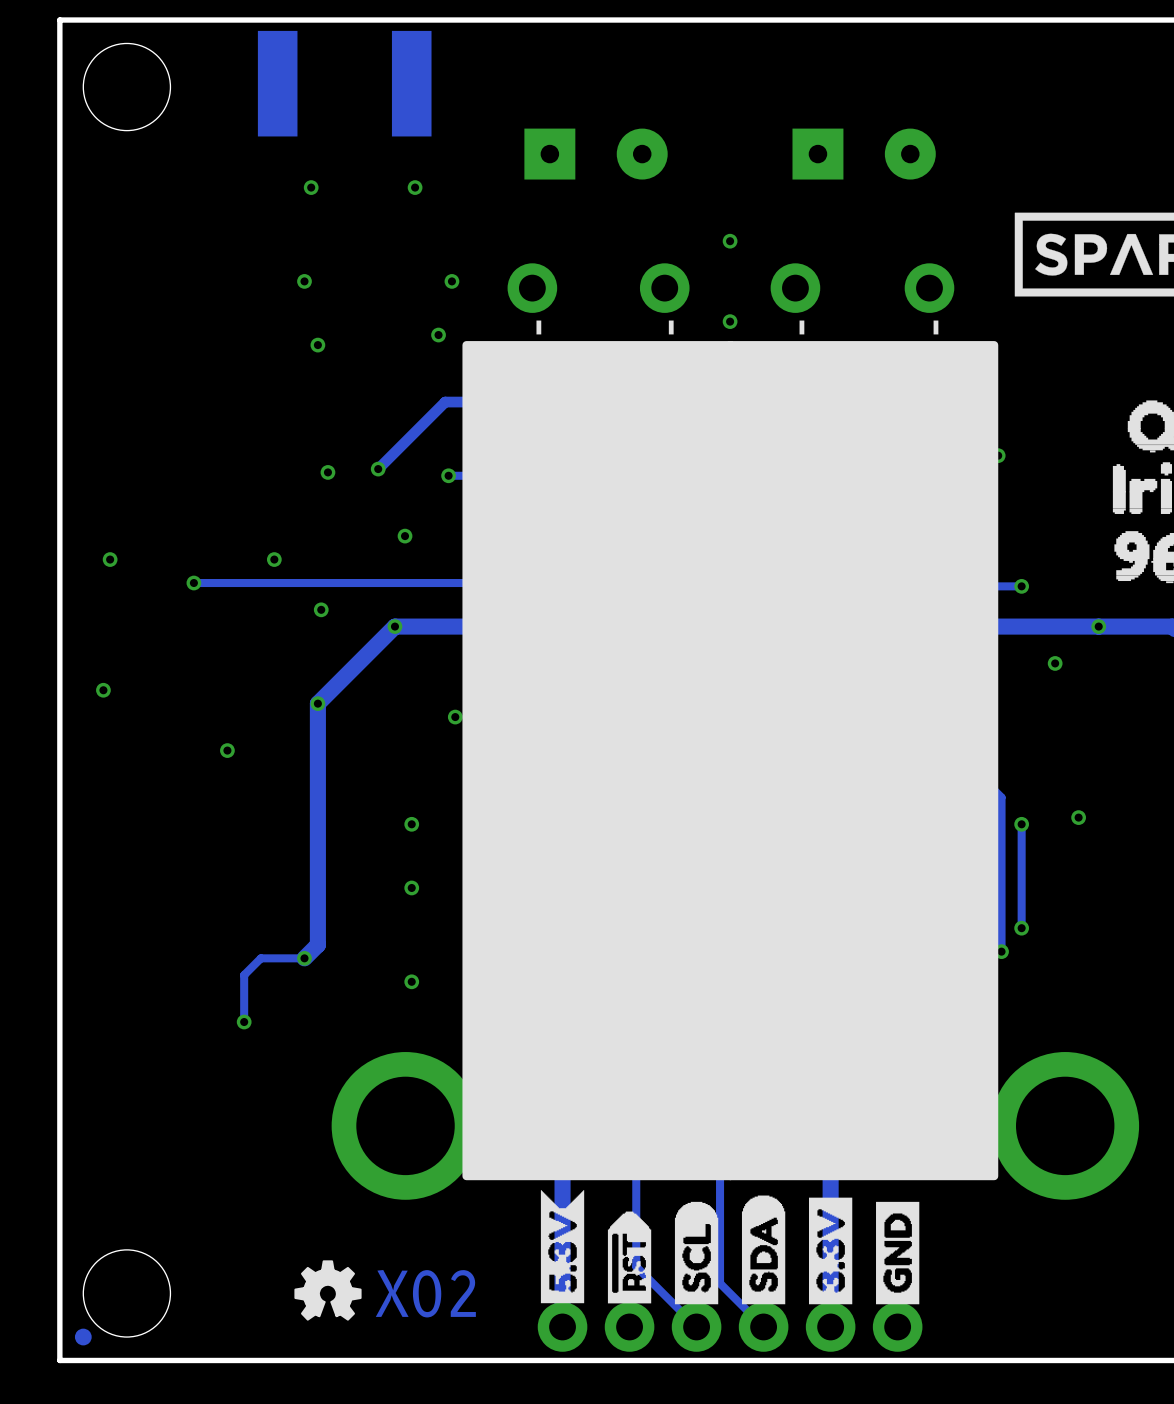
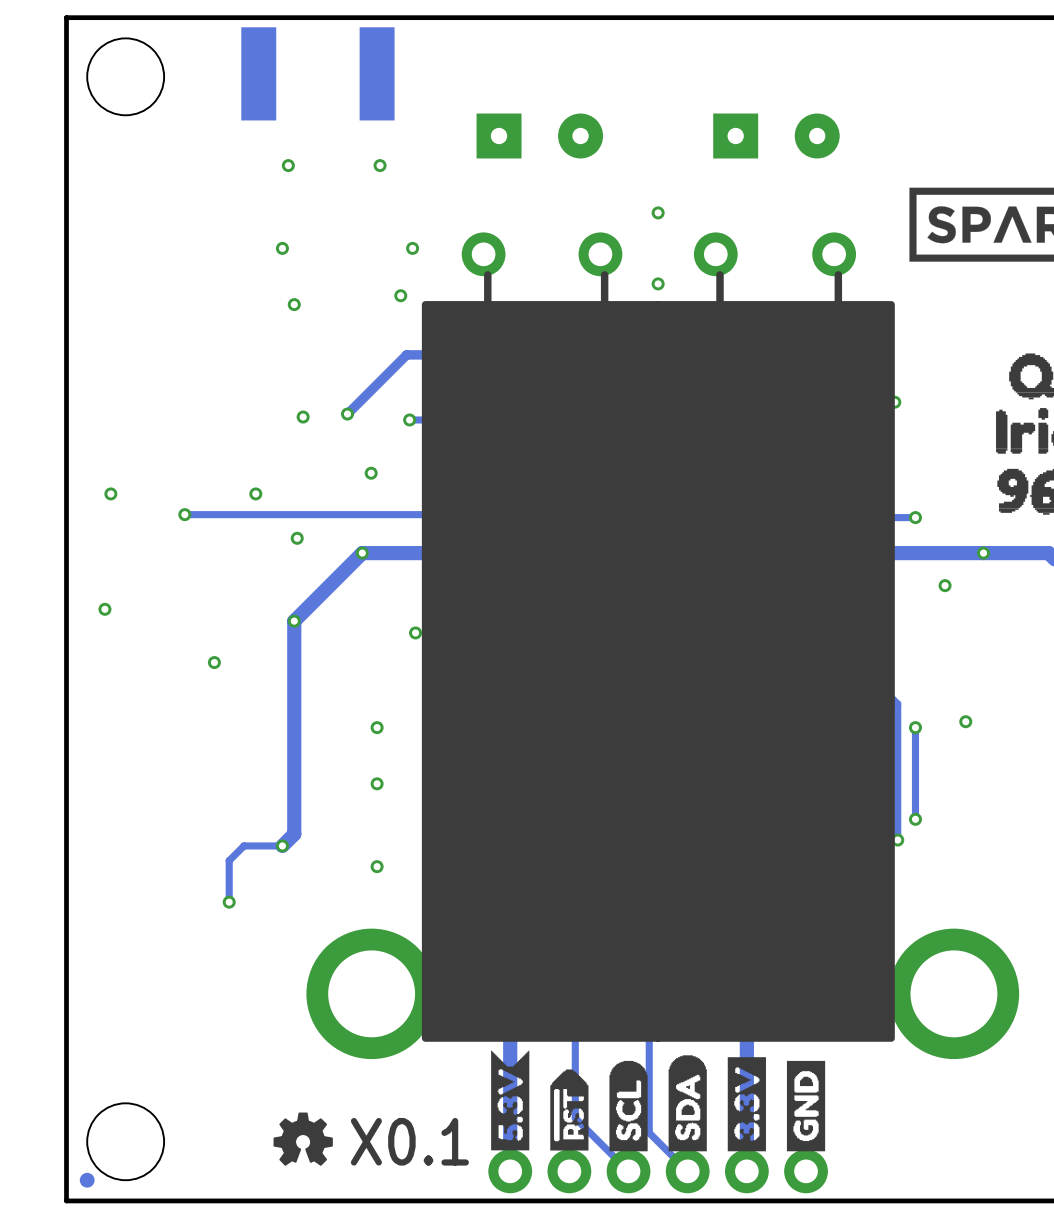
text: X02 (425, 1293) -> none
text: none -> X0.1 (409, 1141)

